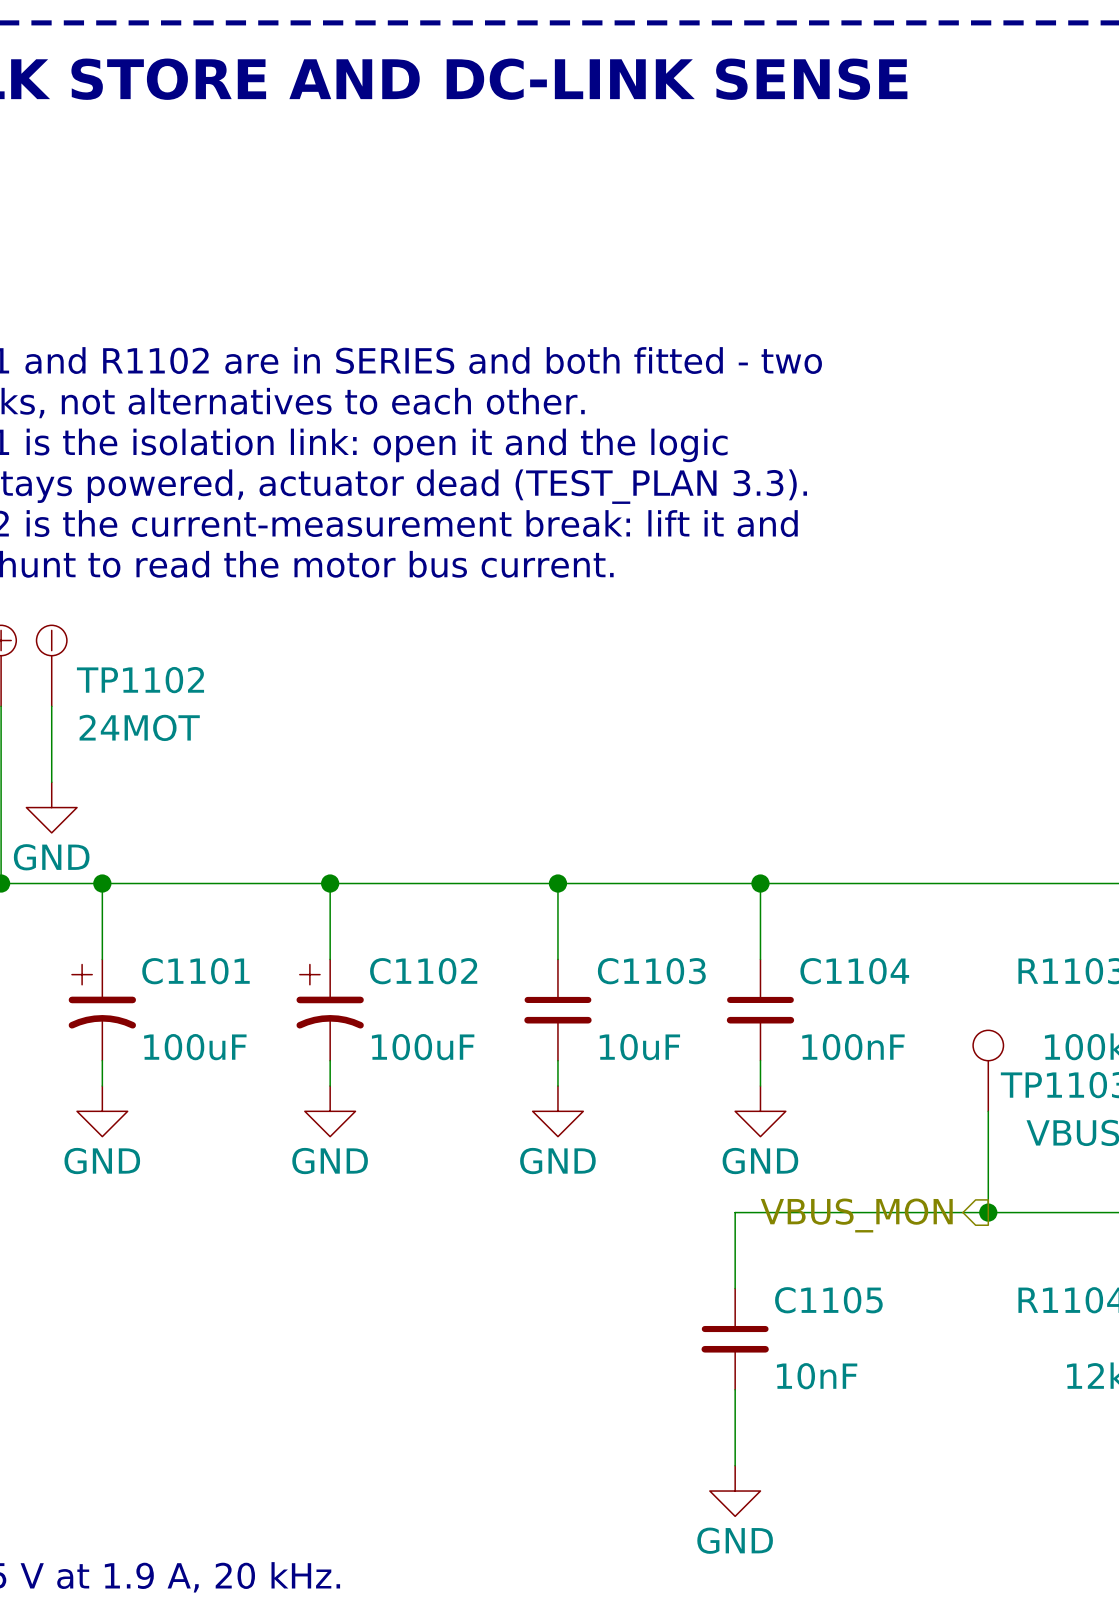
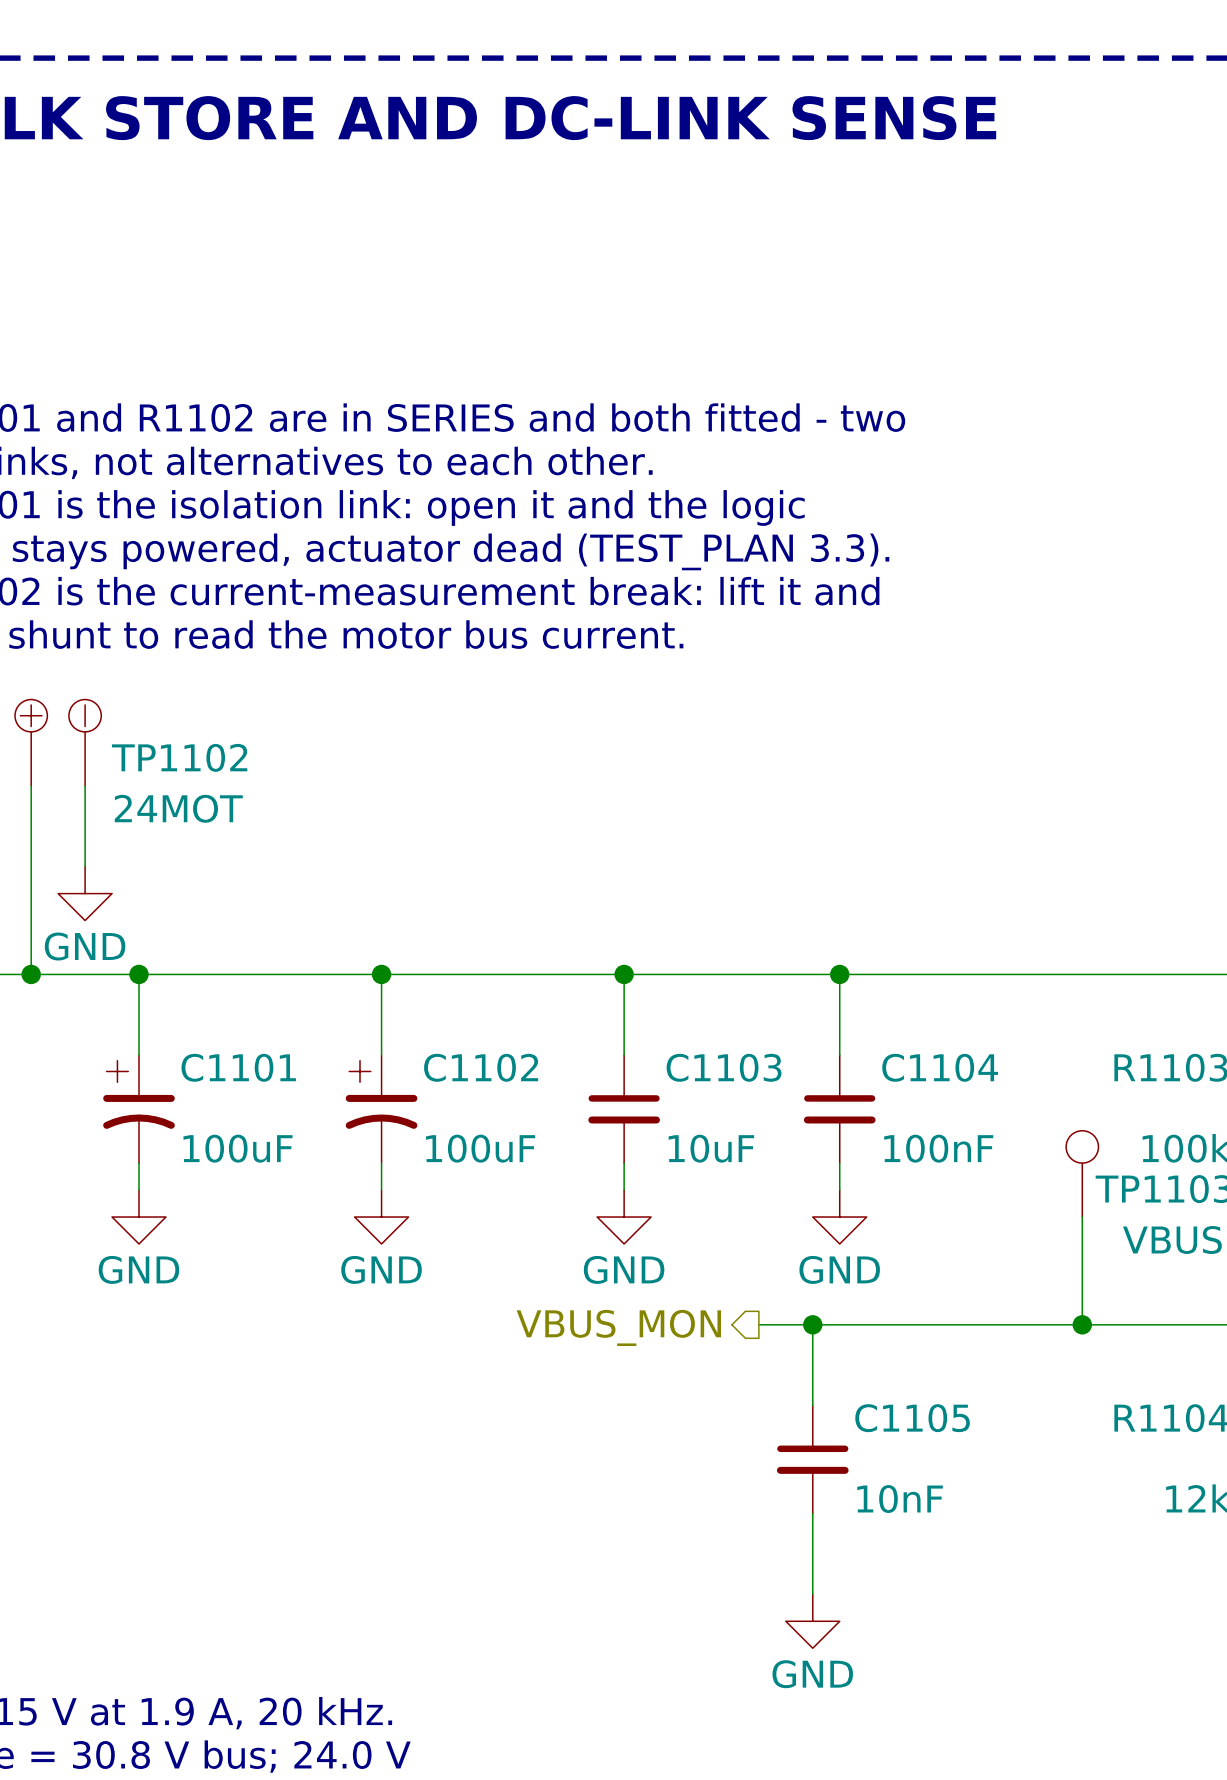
wire: none -> (758, 1324) (812, 1324)
junction: none -> (812, 1324)
hierarchical label position: VBUS_MON (856, 1215) -> VBUS_MON (618, 1327)

